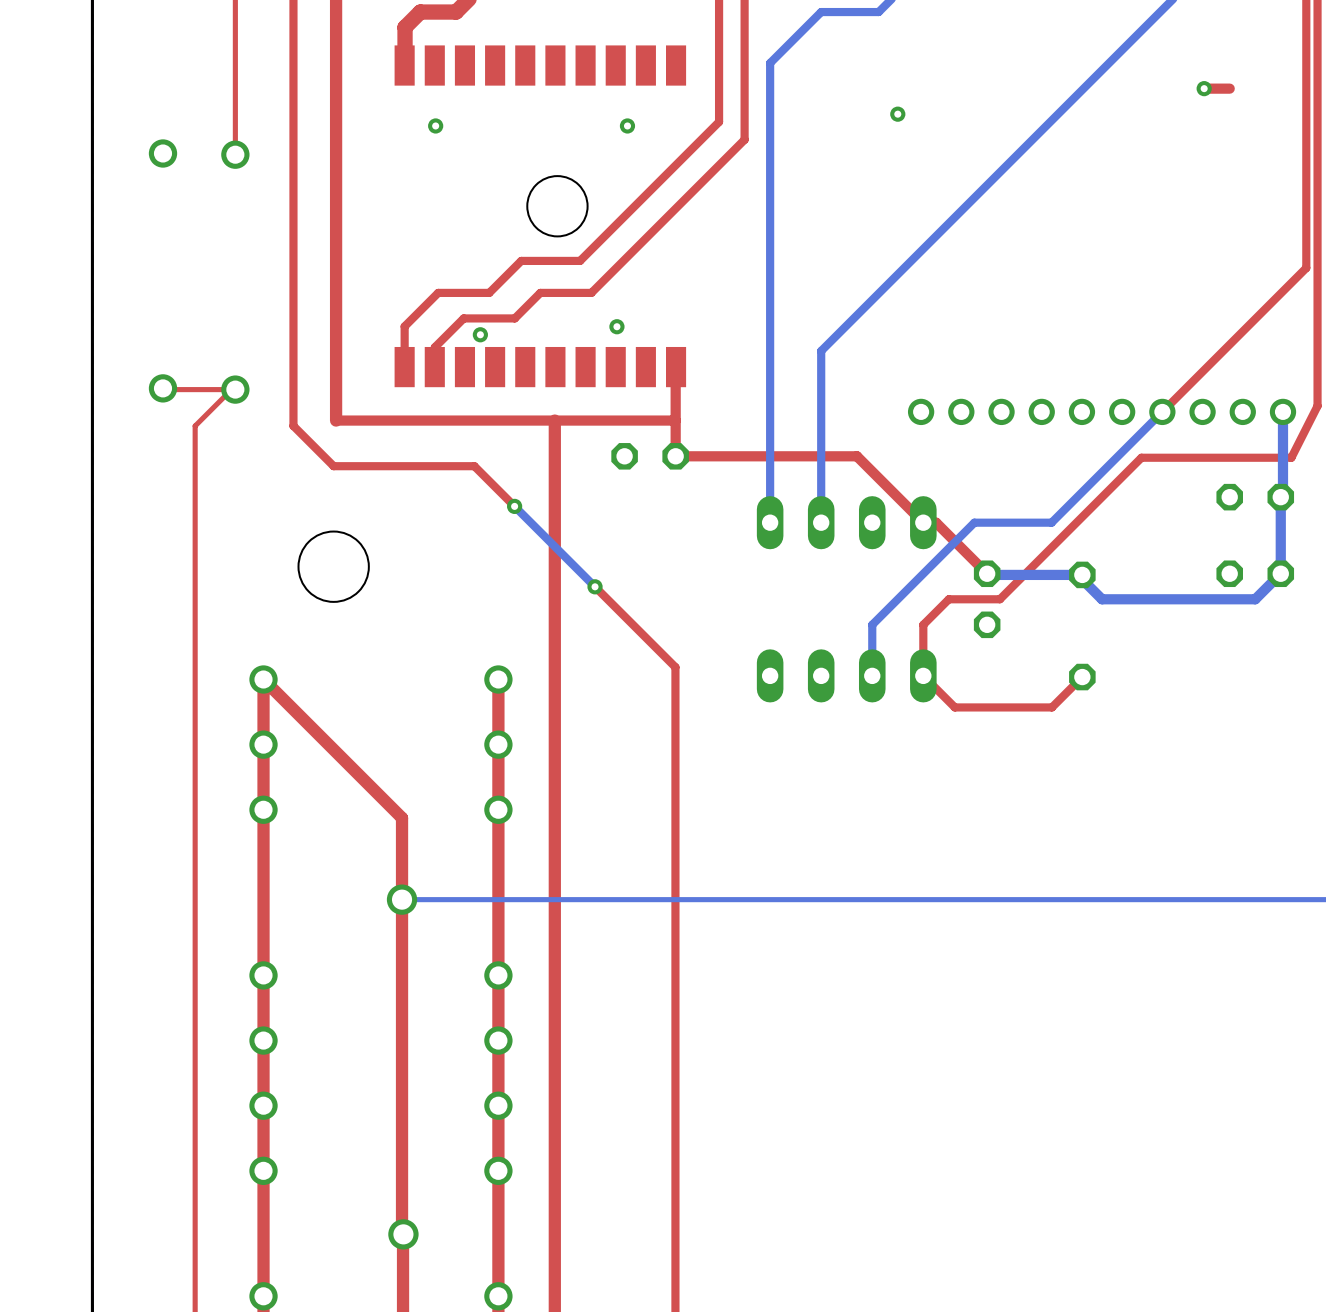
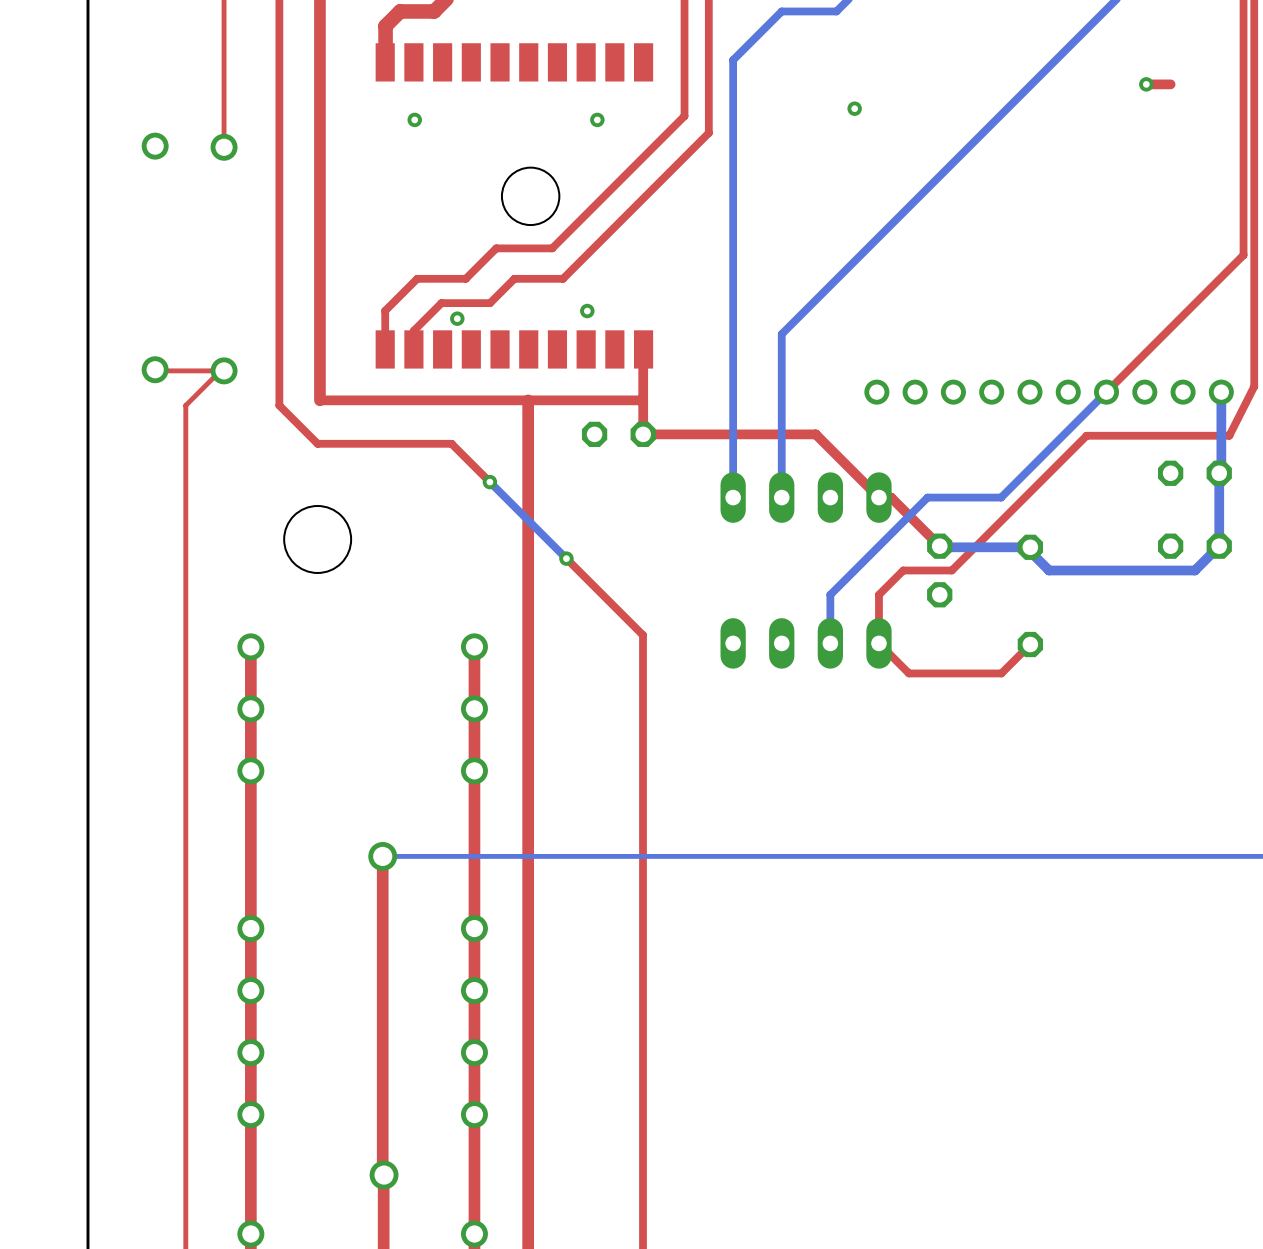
top track: (263, 679) (402, 818) (402, 899) -> none

